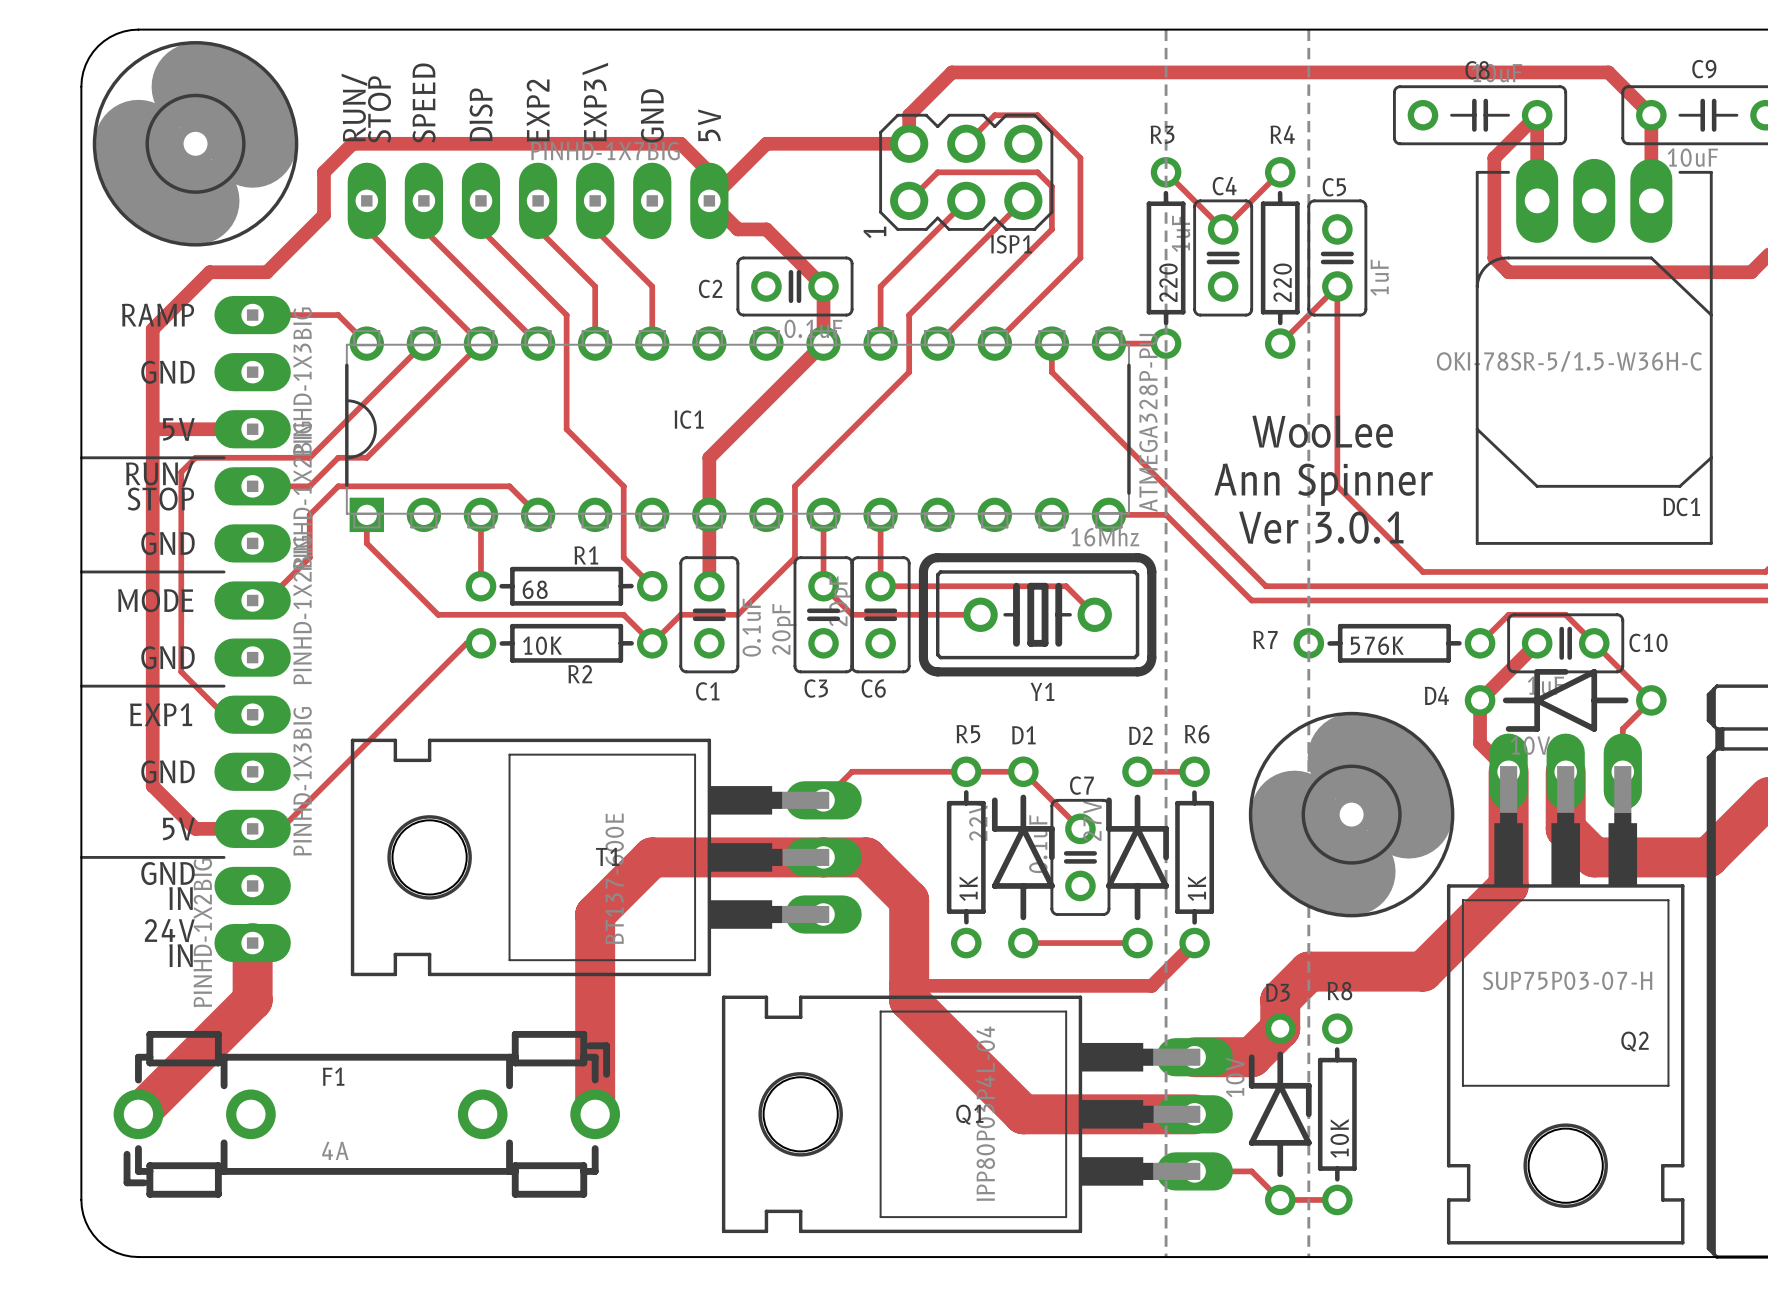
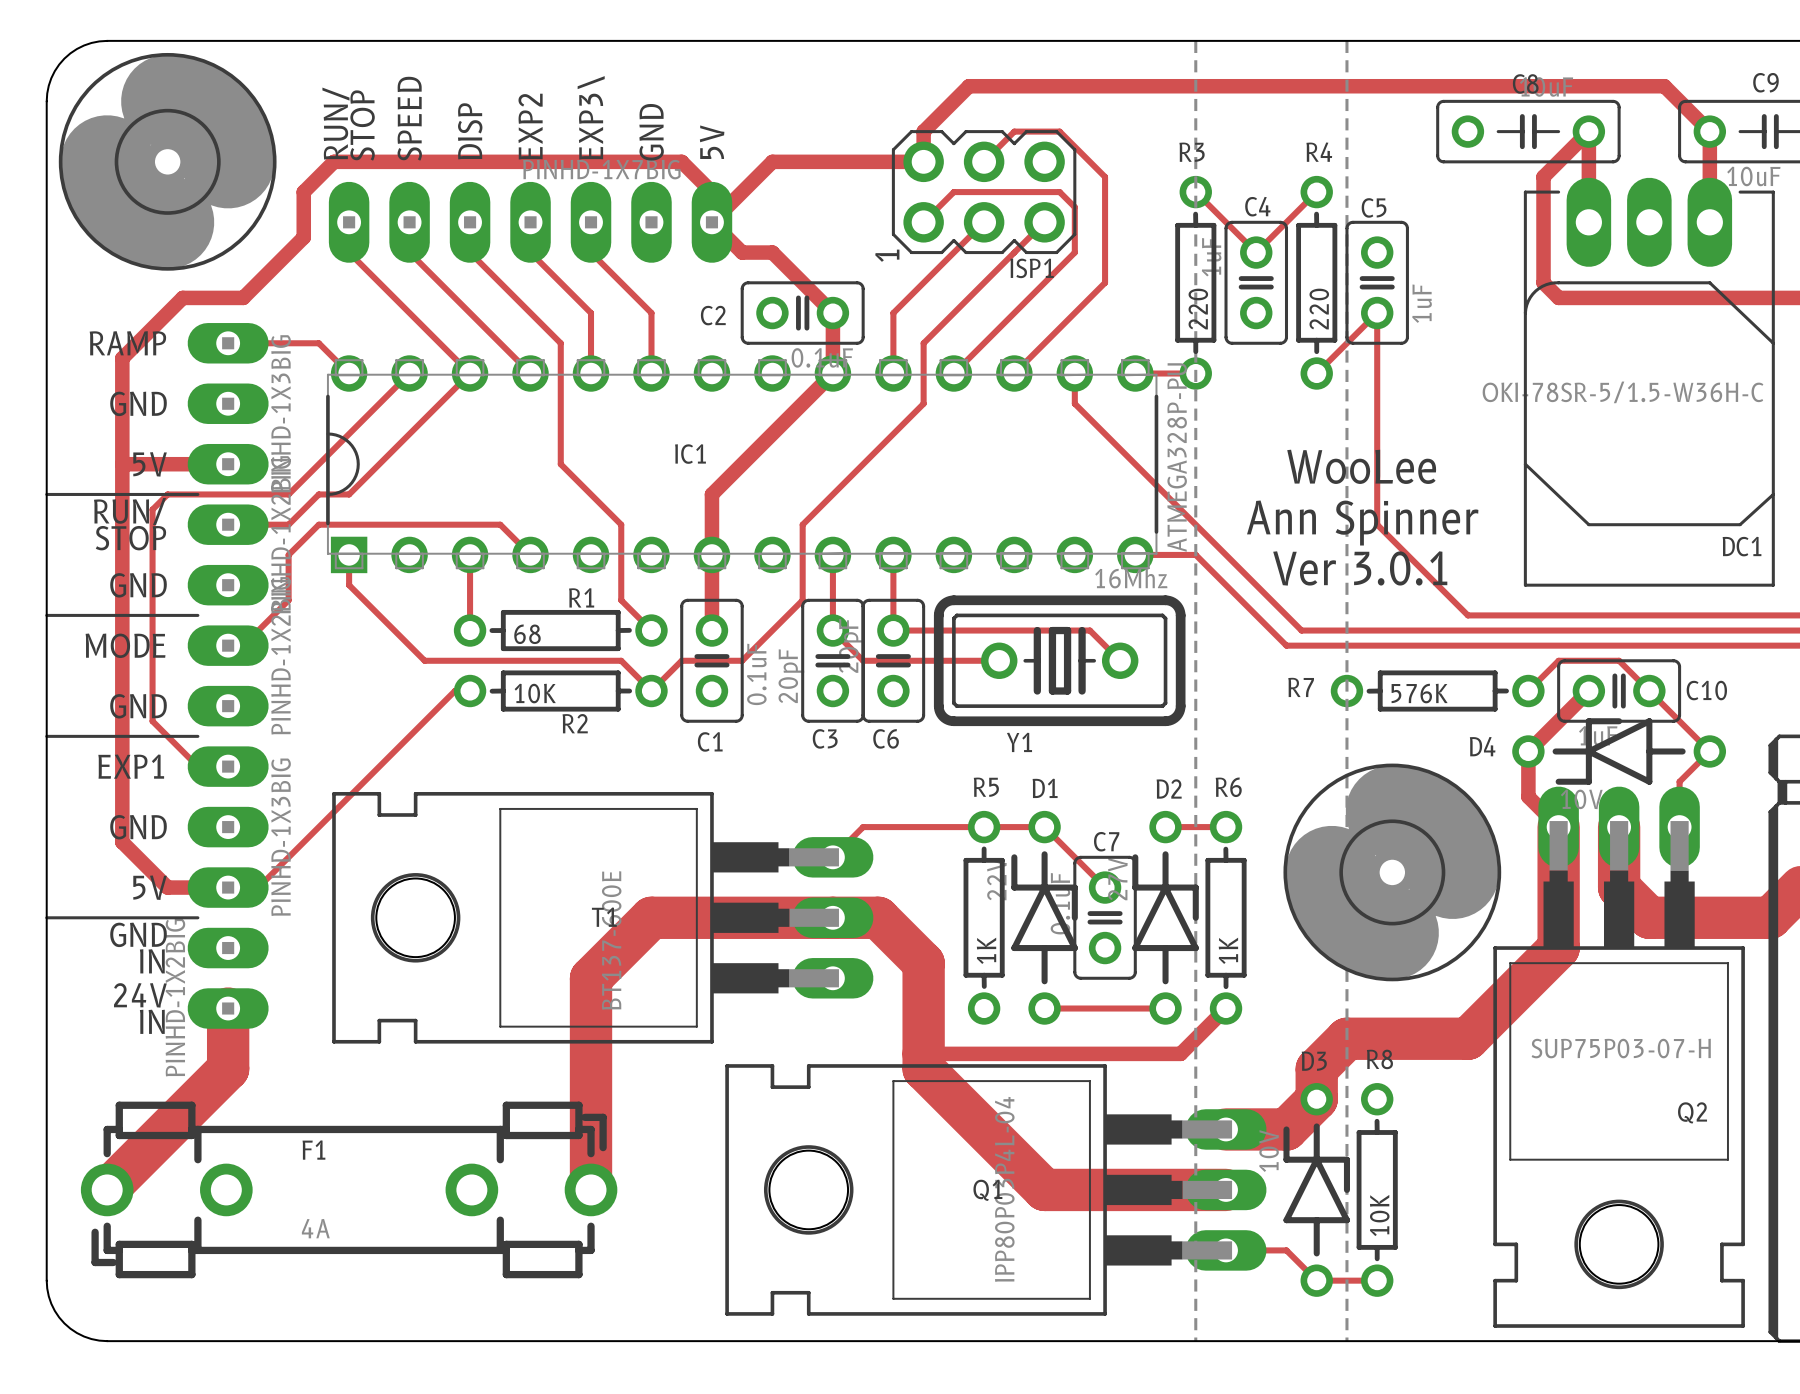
Y1 name position: Y1 (1042, 691) -> Y1 (1019, 742)

